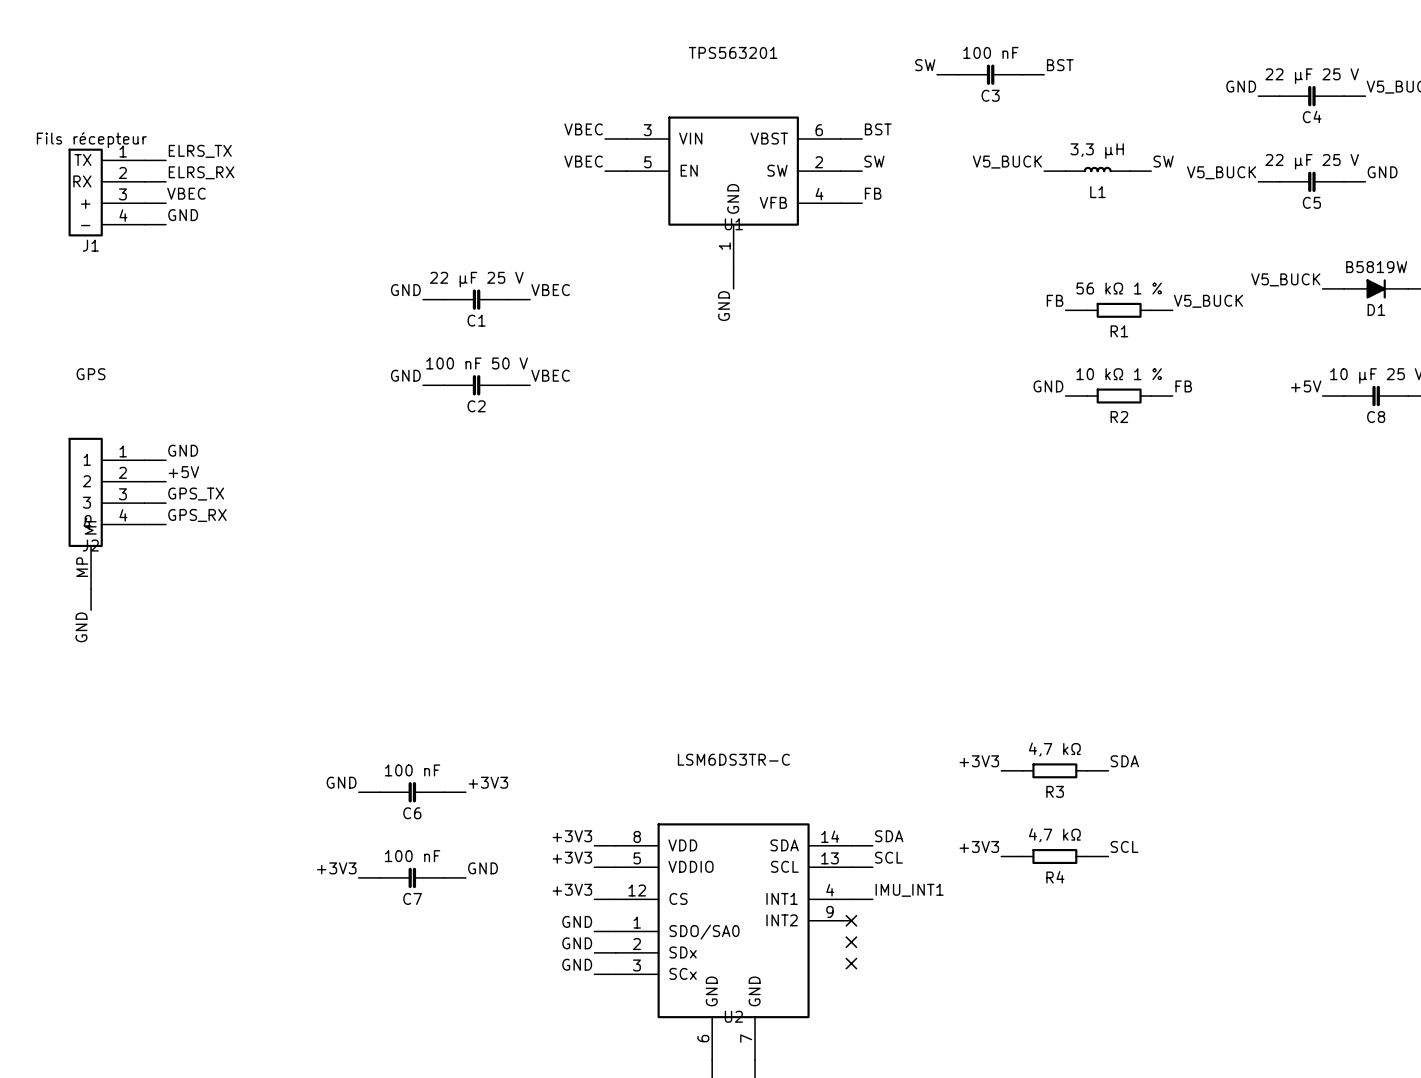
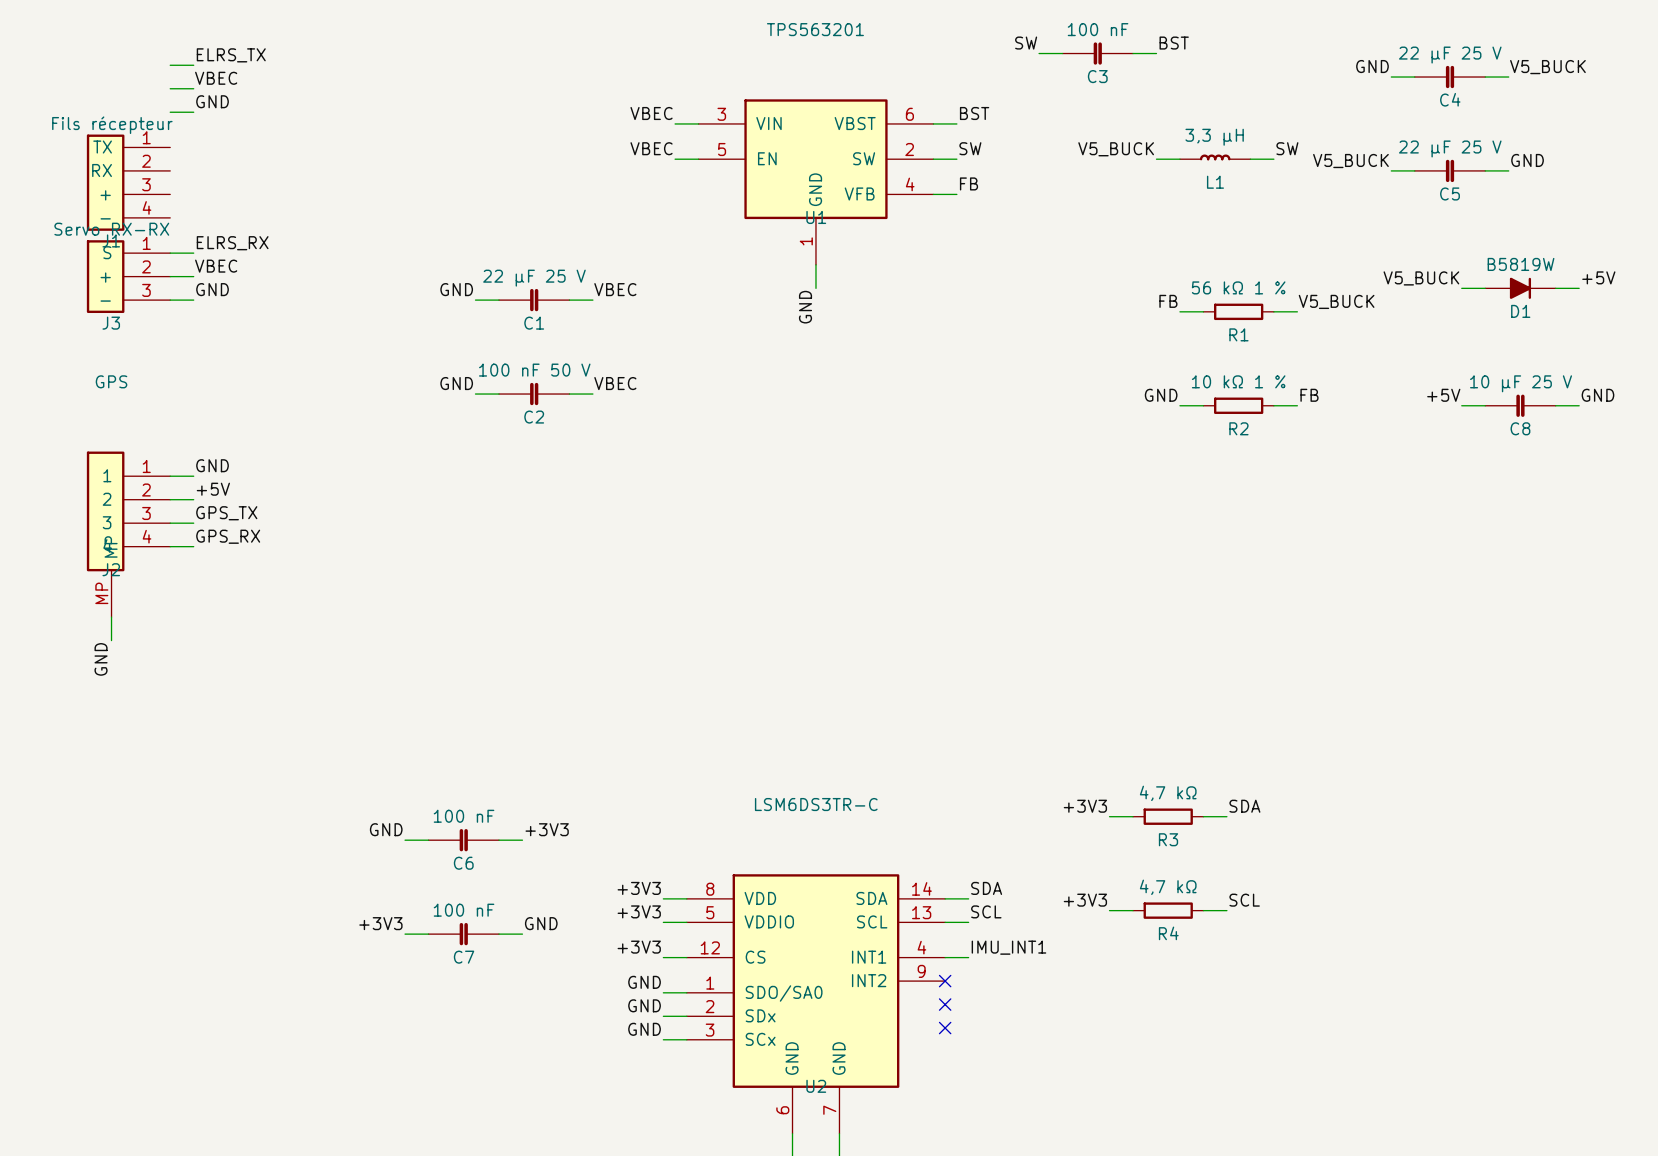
label: none -> VBEC (216, 78)
label: none -> GND (212, 101)
label position: ELRS_TX (200, 151) -> ELRS_TX (231, 55)
wire: (144, 160) (166, 160) -> (170, 65) (193, 65)
label position: ELRS_RX (201, 172) -> ELRS_RX (232, 243)
wire: (144, 181) (166, 181) -> (170, 88) (193, 88)
label: VBEC (186, 193) -> none
wire: (144, 203) (166, 203) -> (170, 112) (193, 112)
label: GND (183, 215) -> none
wire: (144, 224) (166, 224) -> (170, 300) (193, 300)
wire: none -> (170, 253) (193, 253)
label: none -> VBEC (216, 266)
J3: none -> Servo RX-RX (128, 276)
wire: none -> (170, 276) (193, 276)
label: none -> GND (212, 289)

